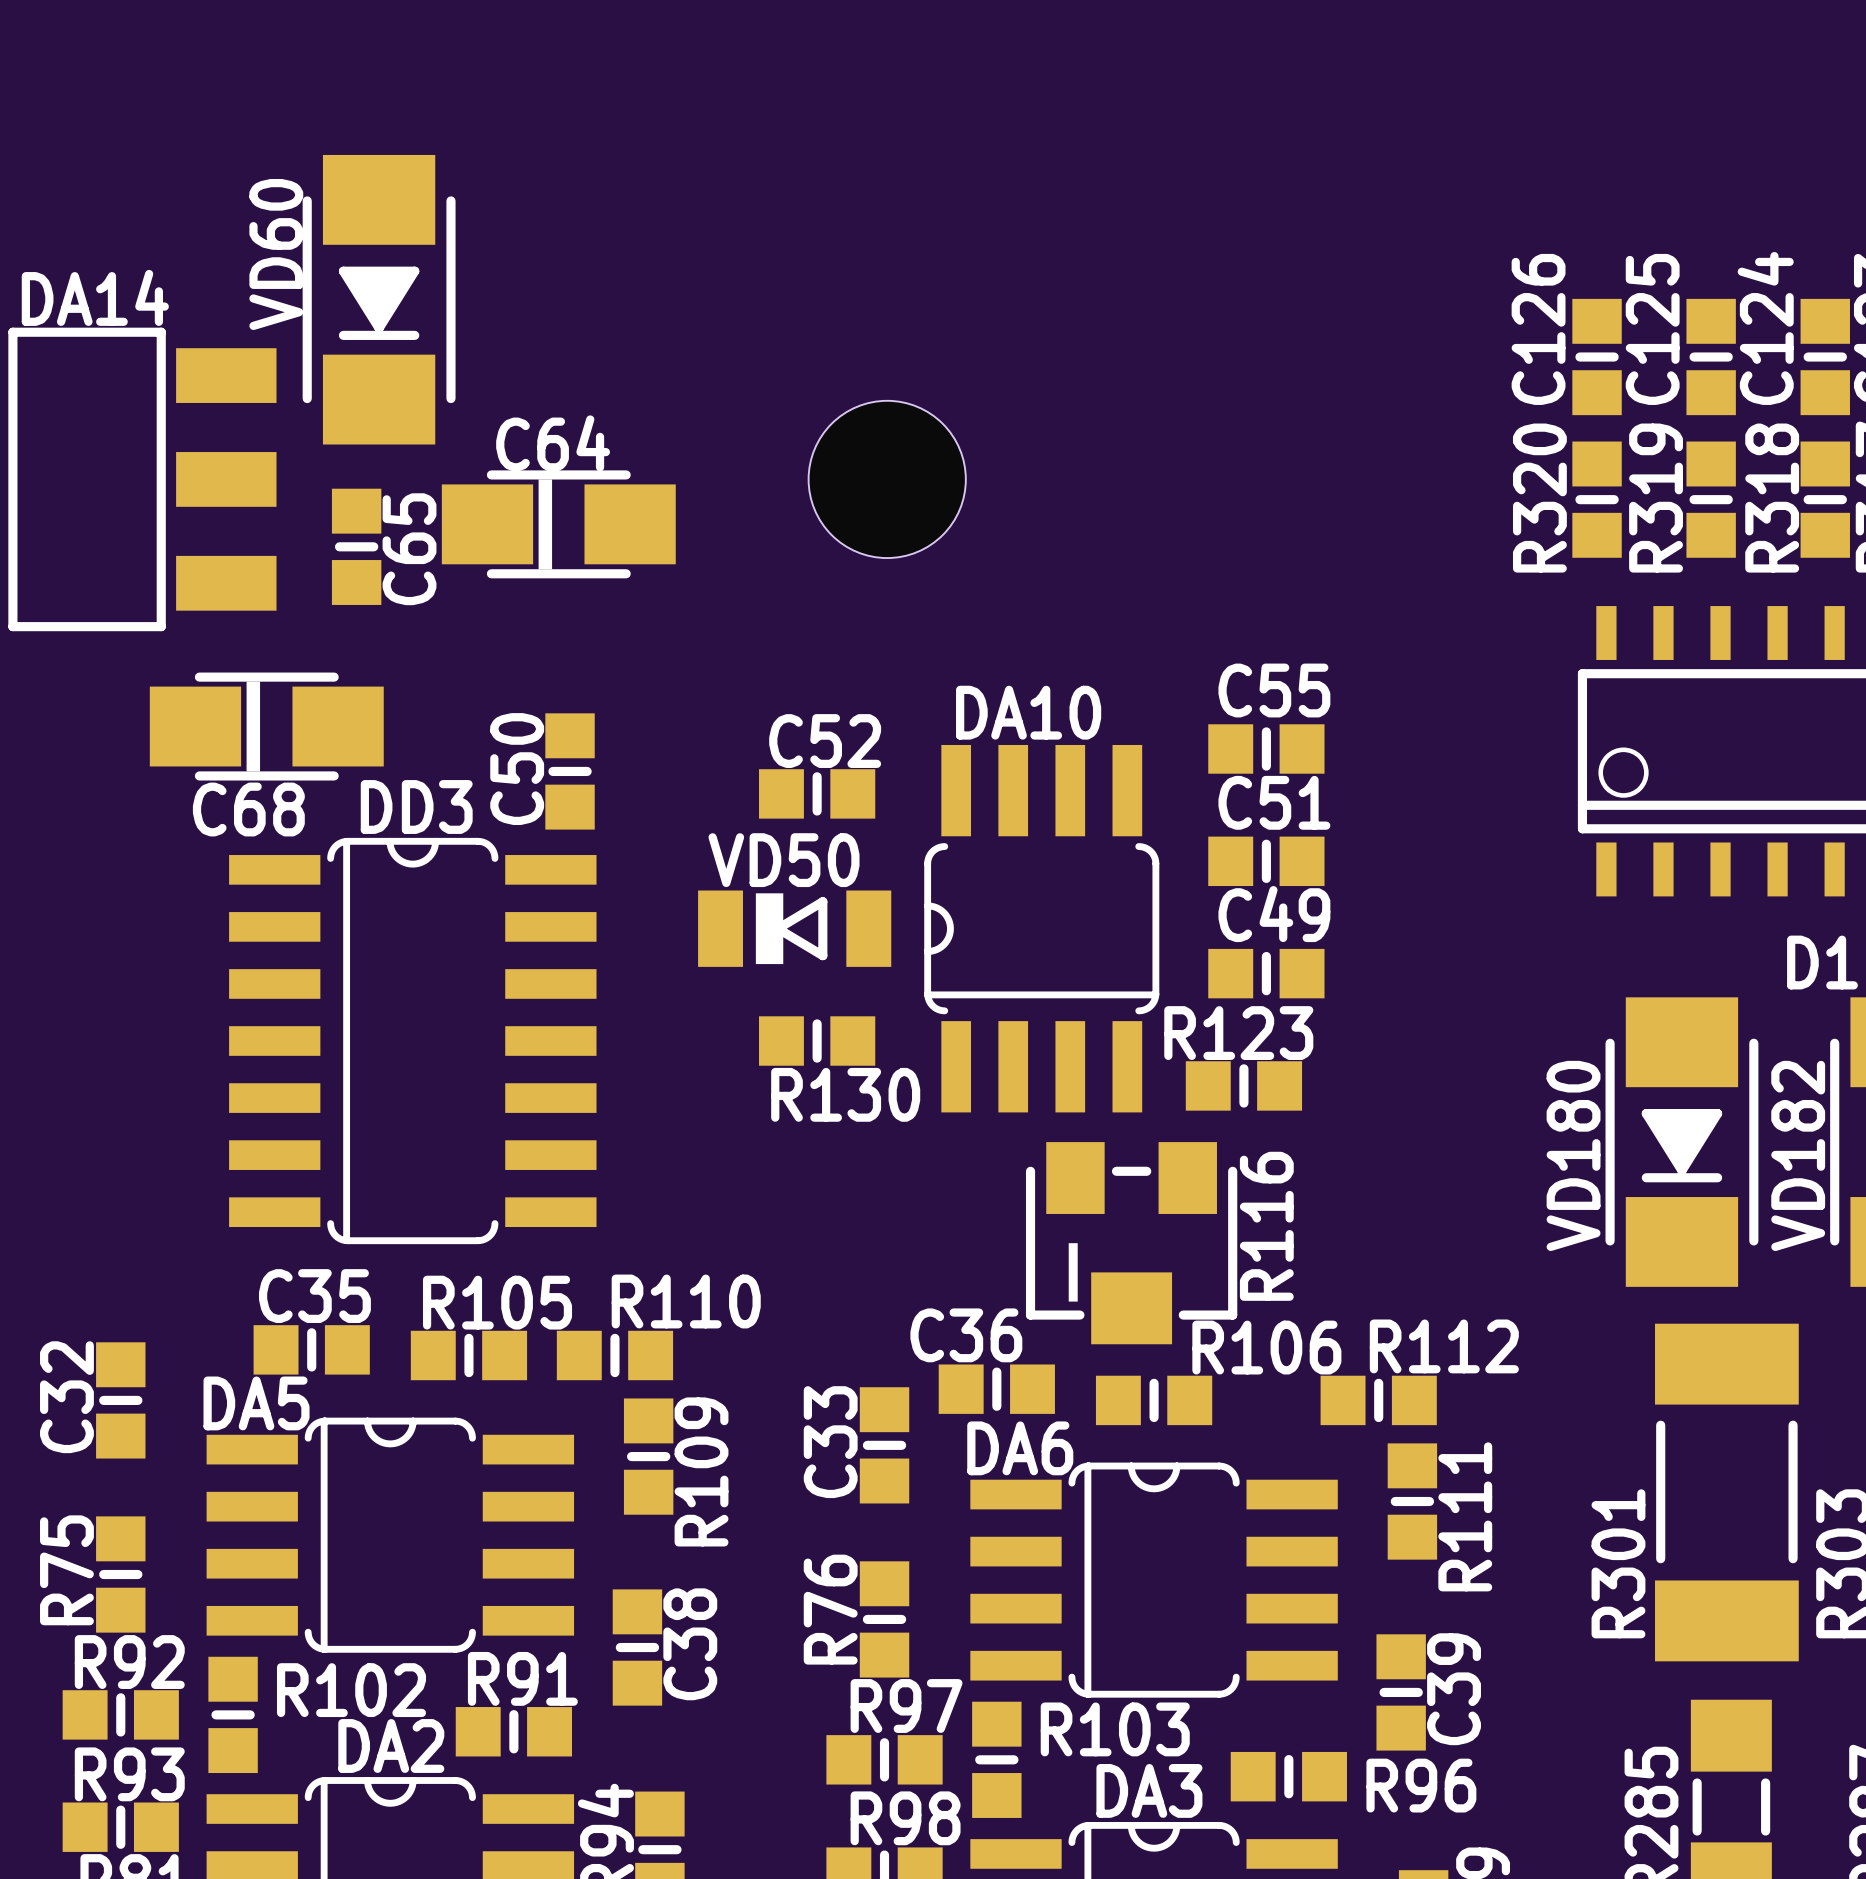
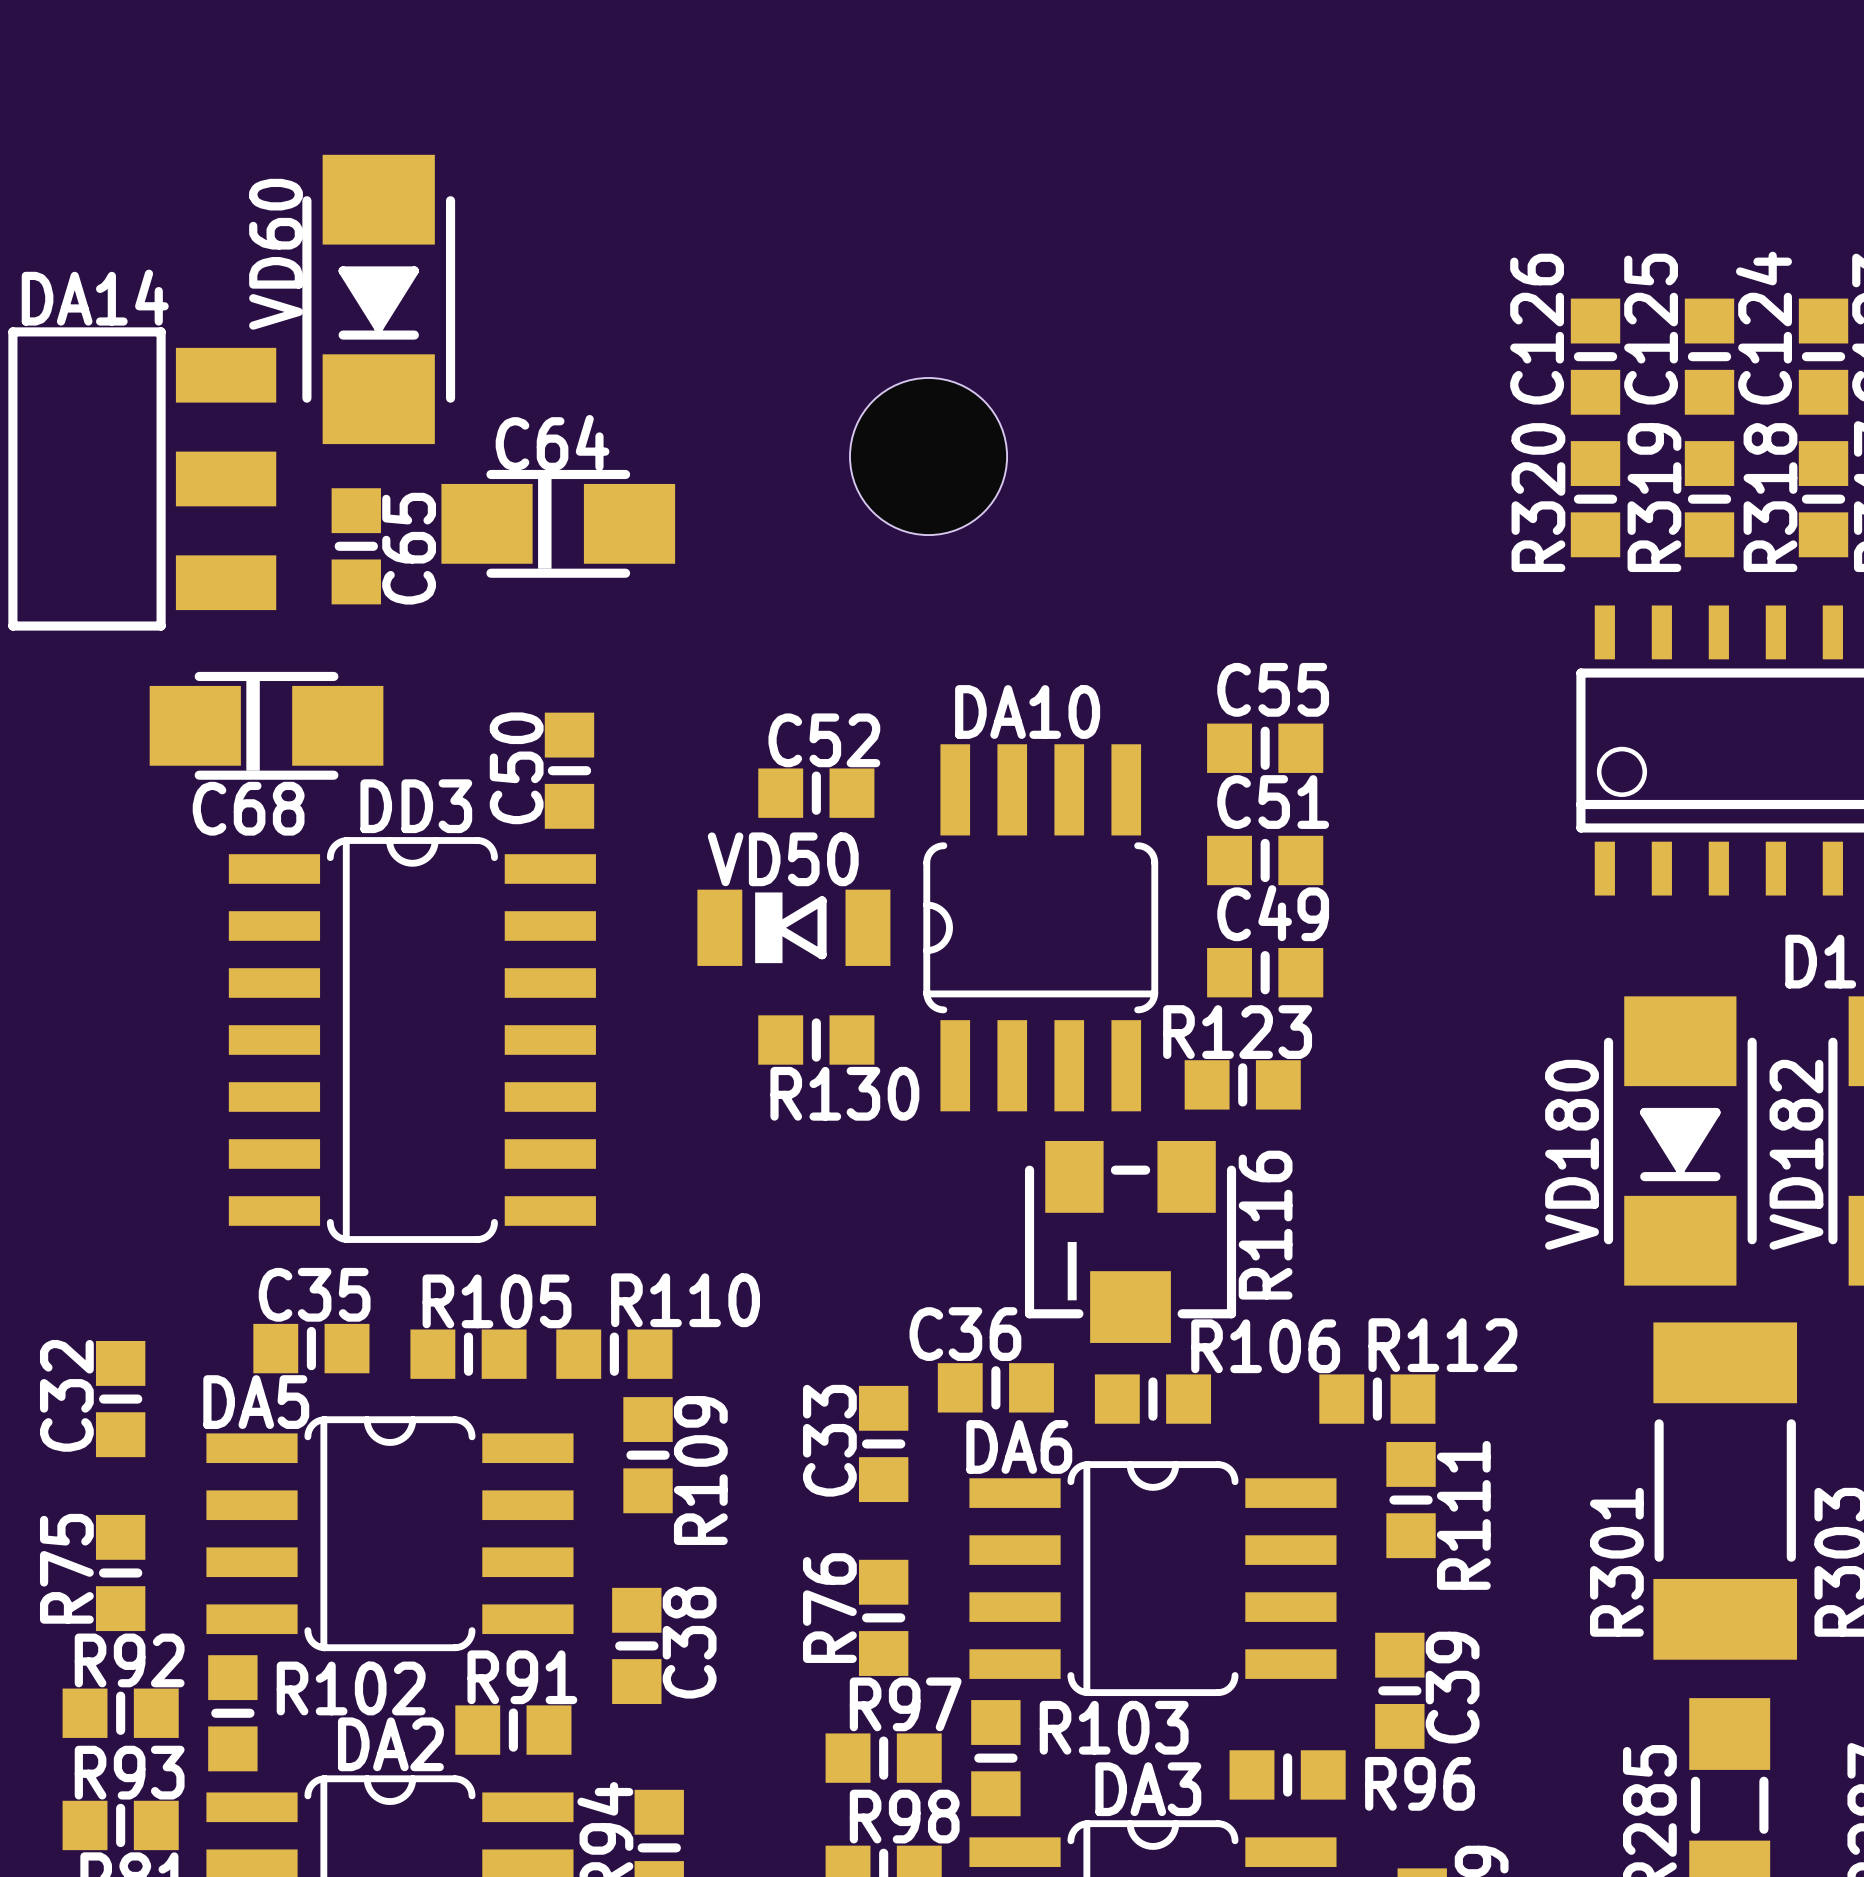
part position: (887, 479) -> (928, 456)

